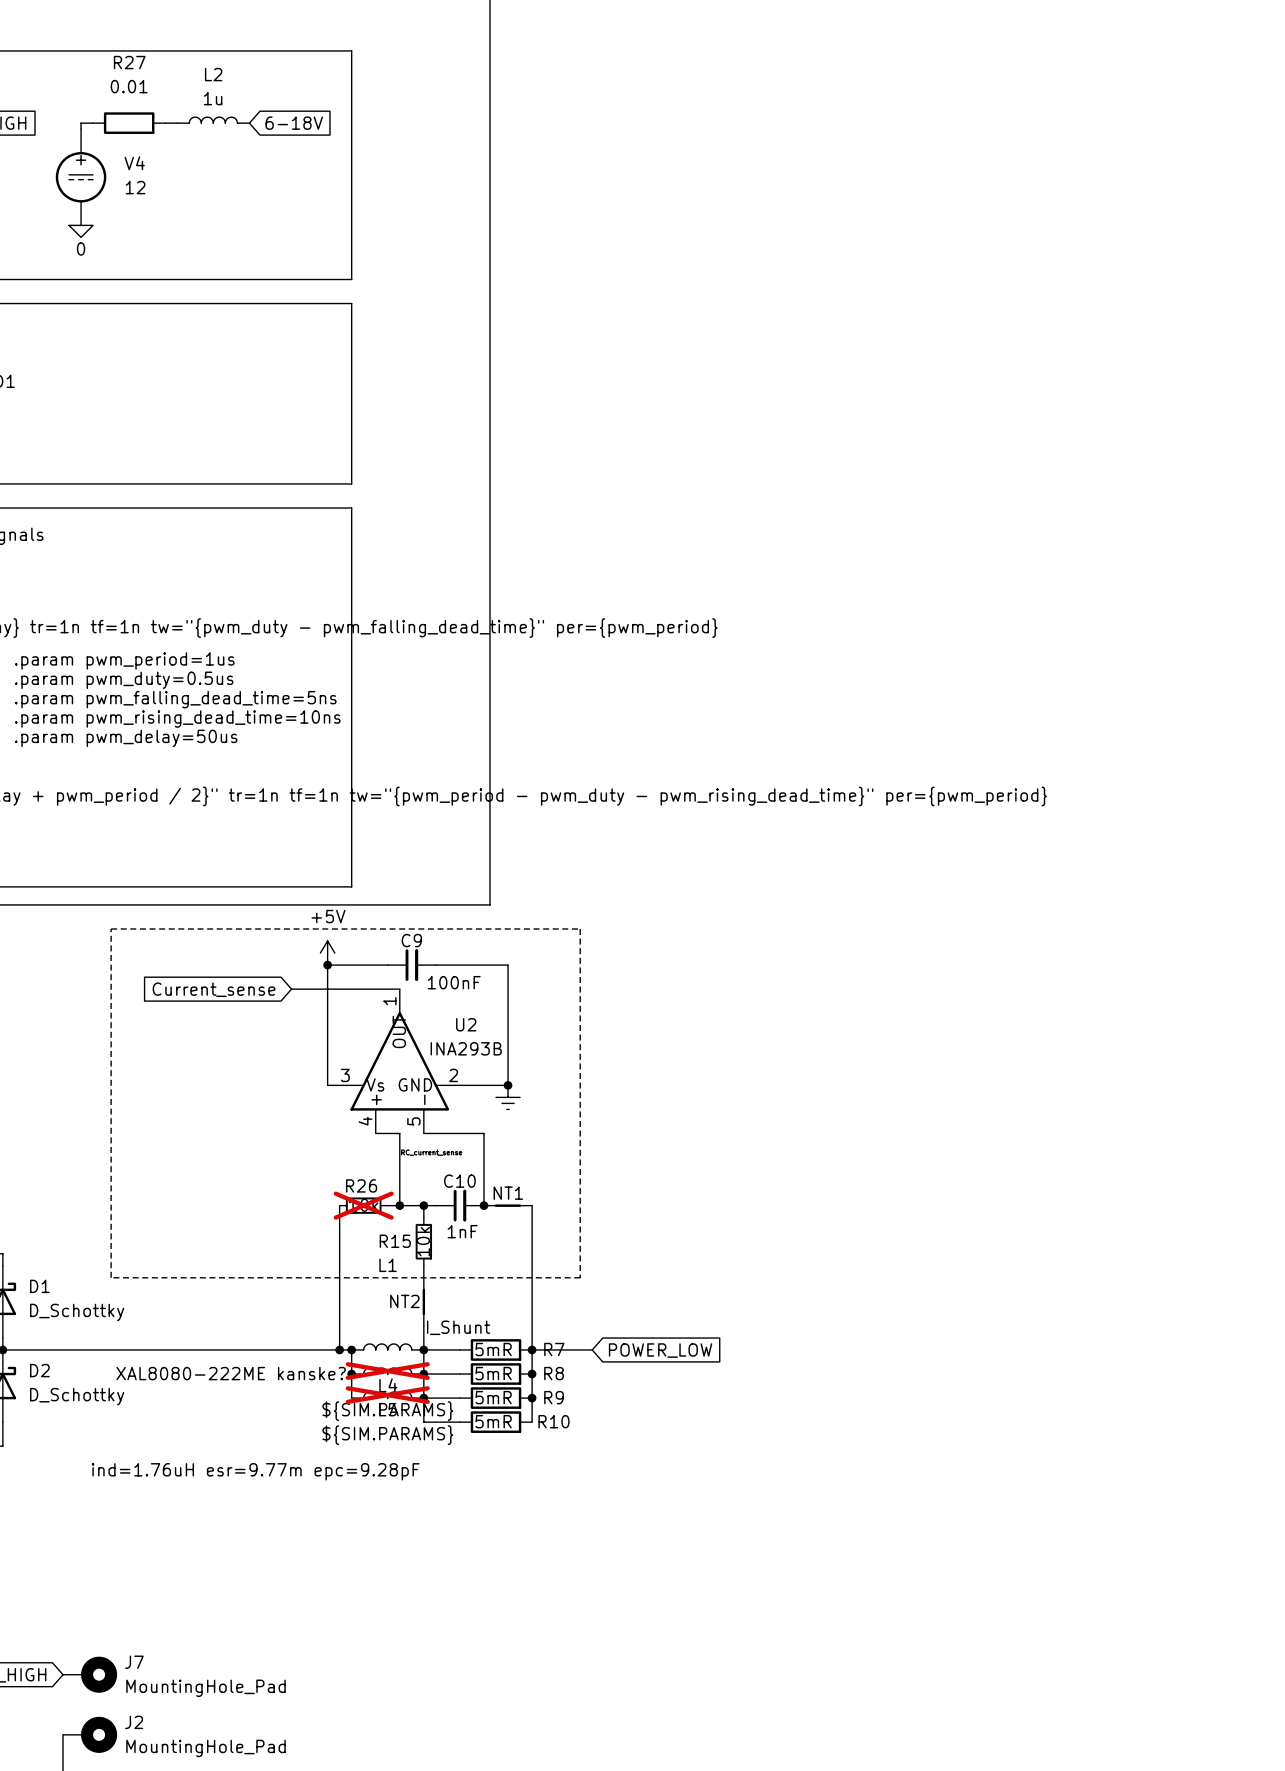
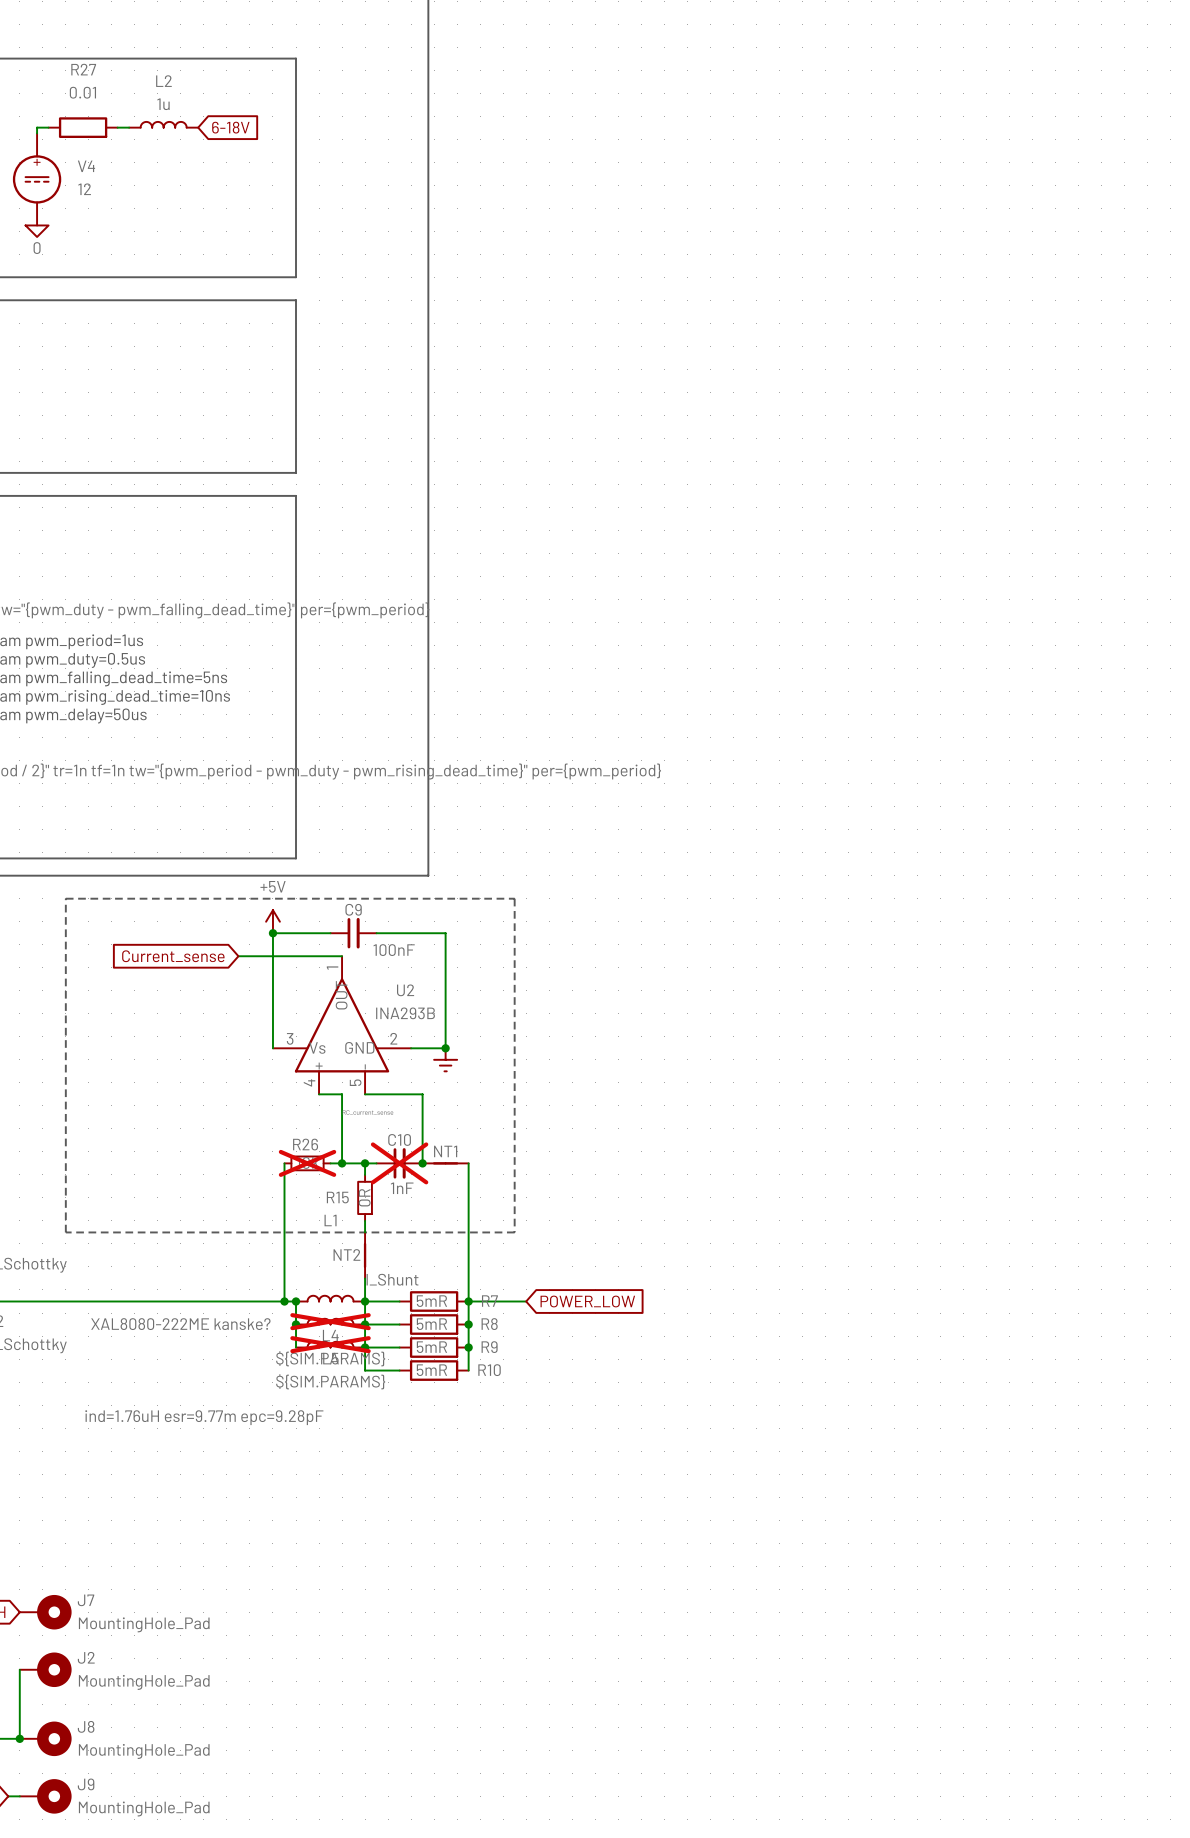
C10 do-not-place cross: none -> (399, 1163)
R15 value: 10k (423, 1241) -> 0R (364, 1197)

